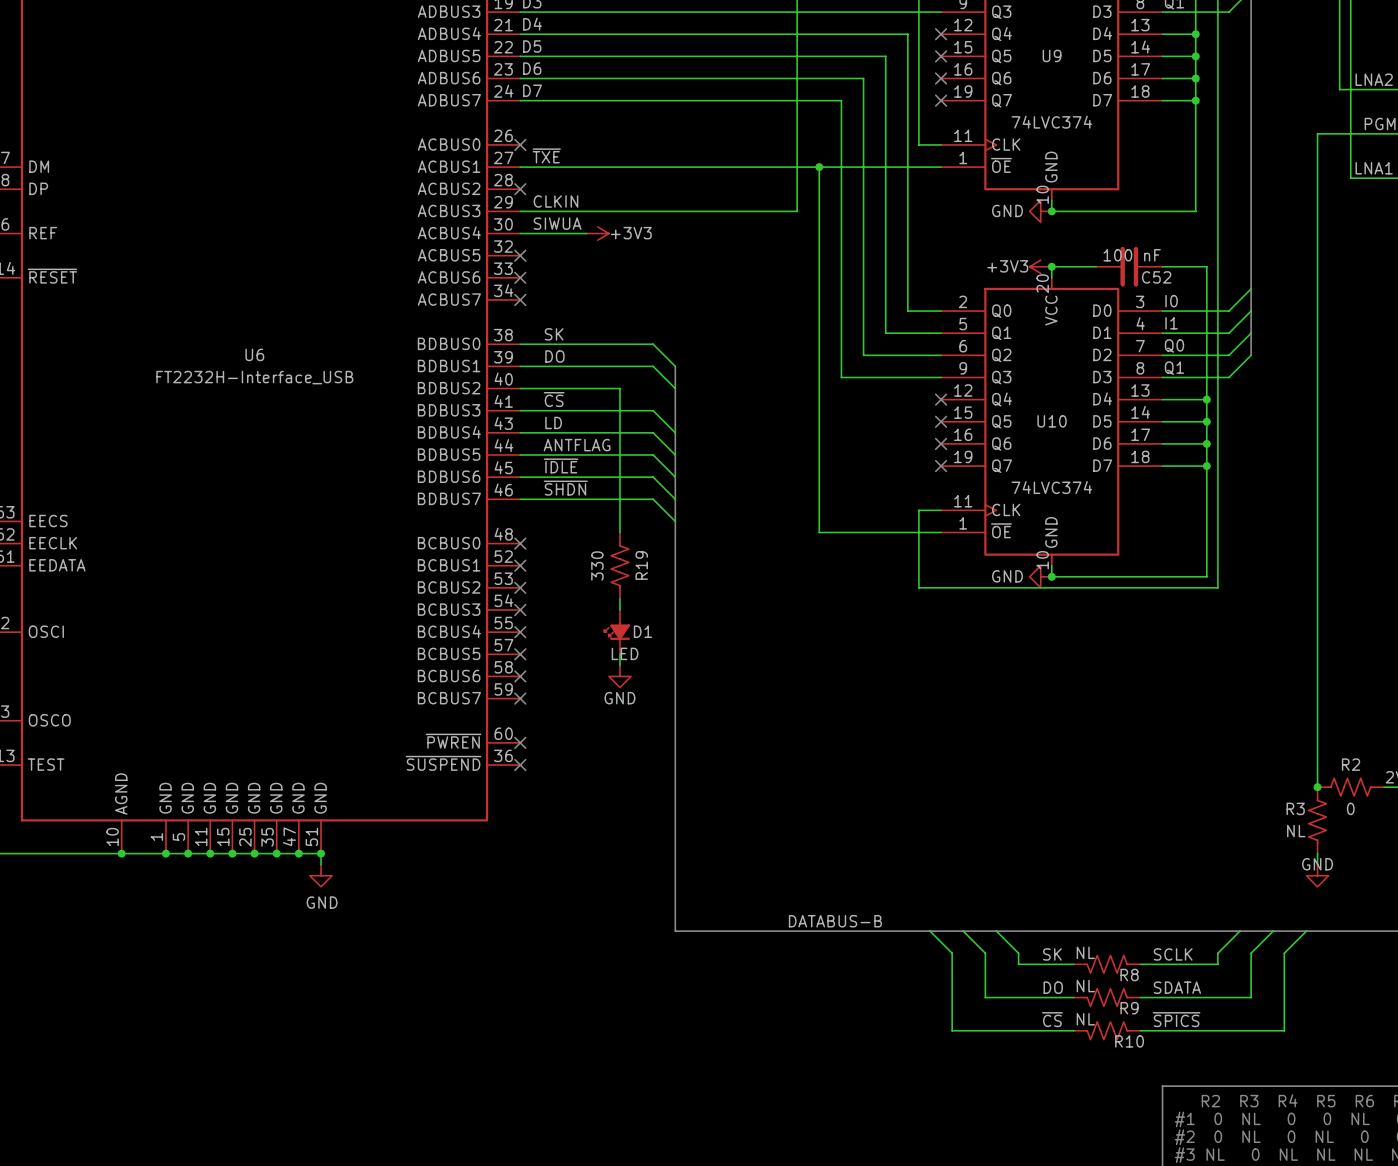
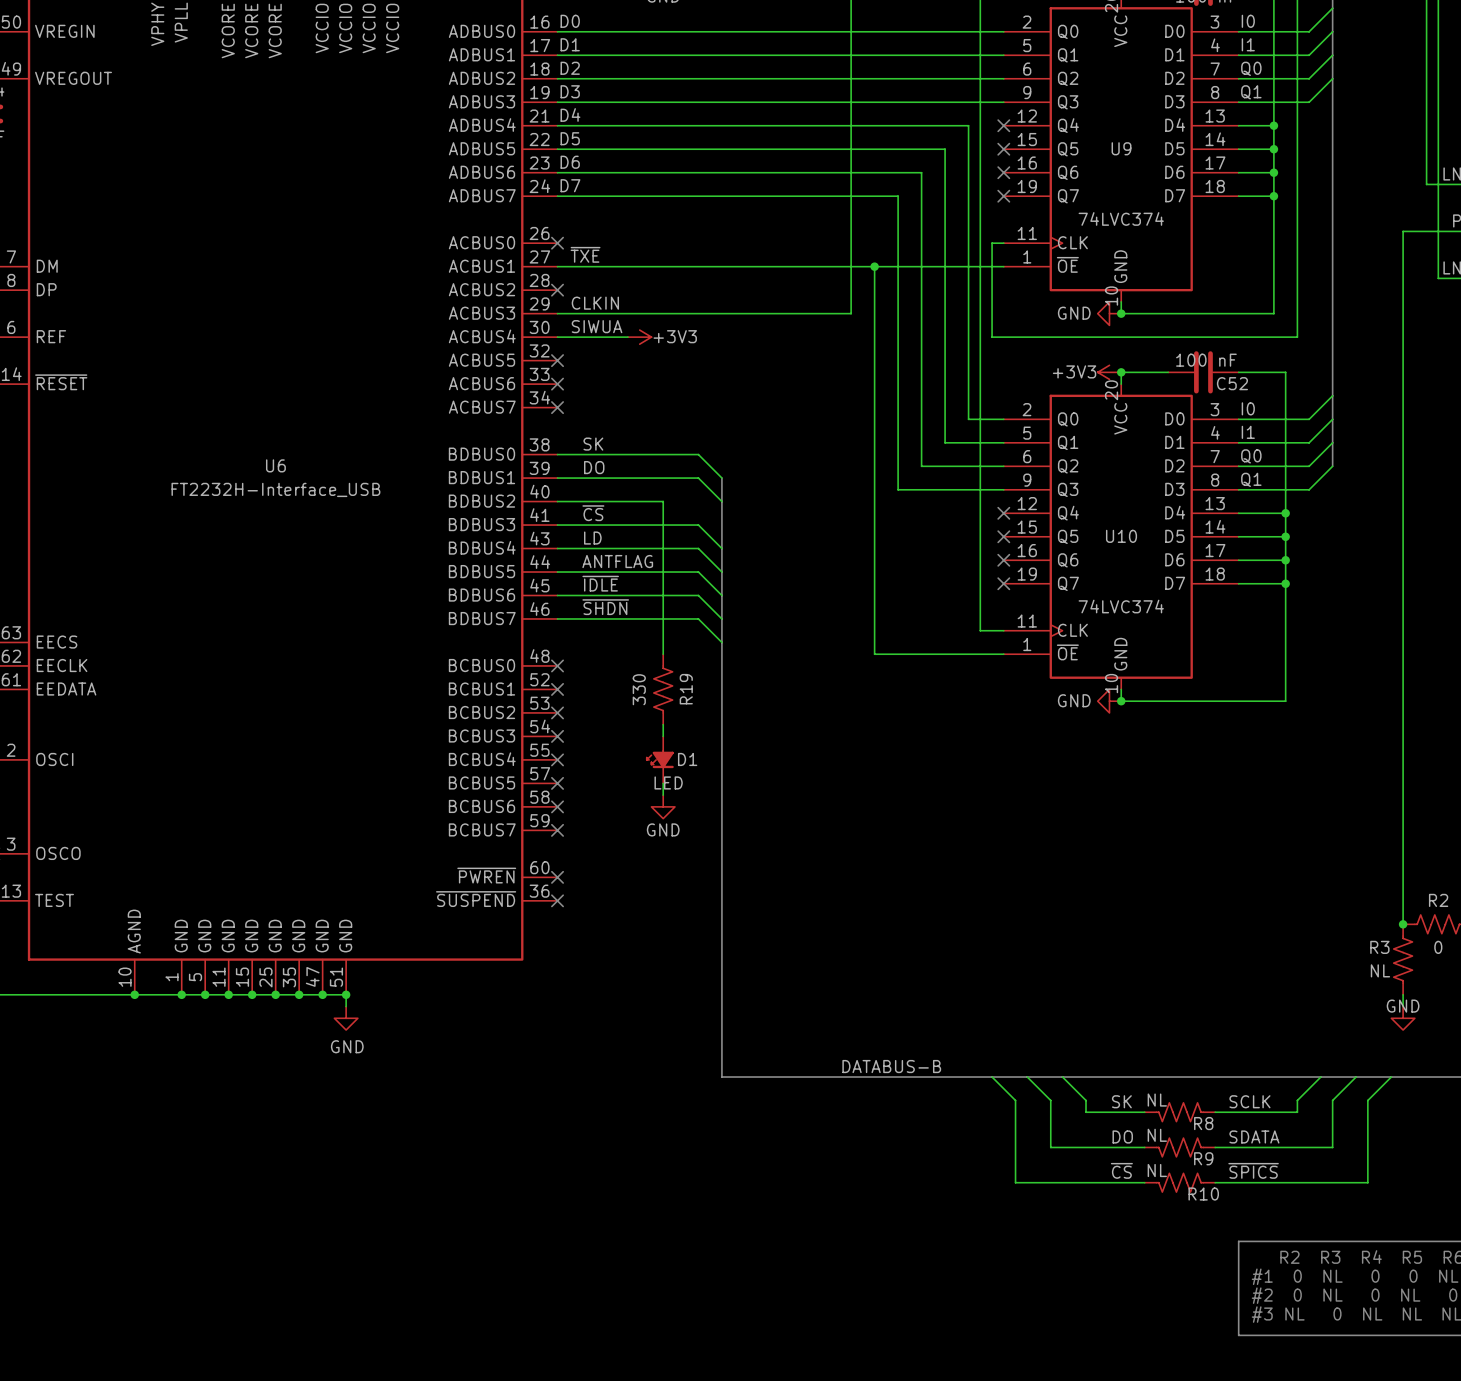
wire: (918, 144) (930, 144) -> (1297, 337) (992, 337) (992, 243)
wire: (1217, 233) (1217, 587) (918, 587) (918, 510) -> (980, 243) (980, 630)

